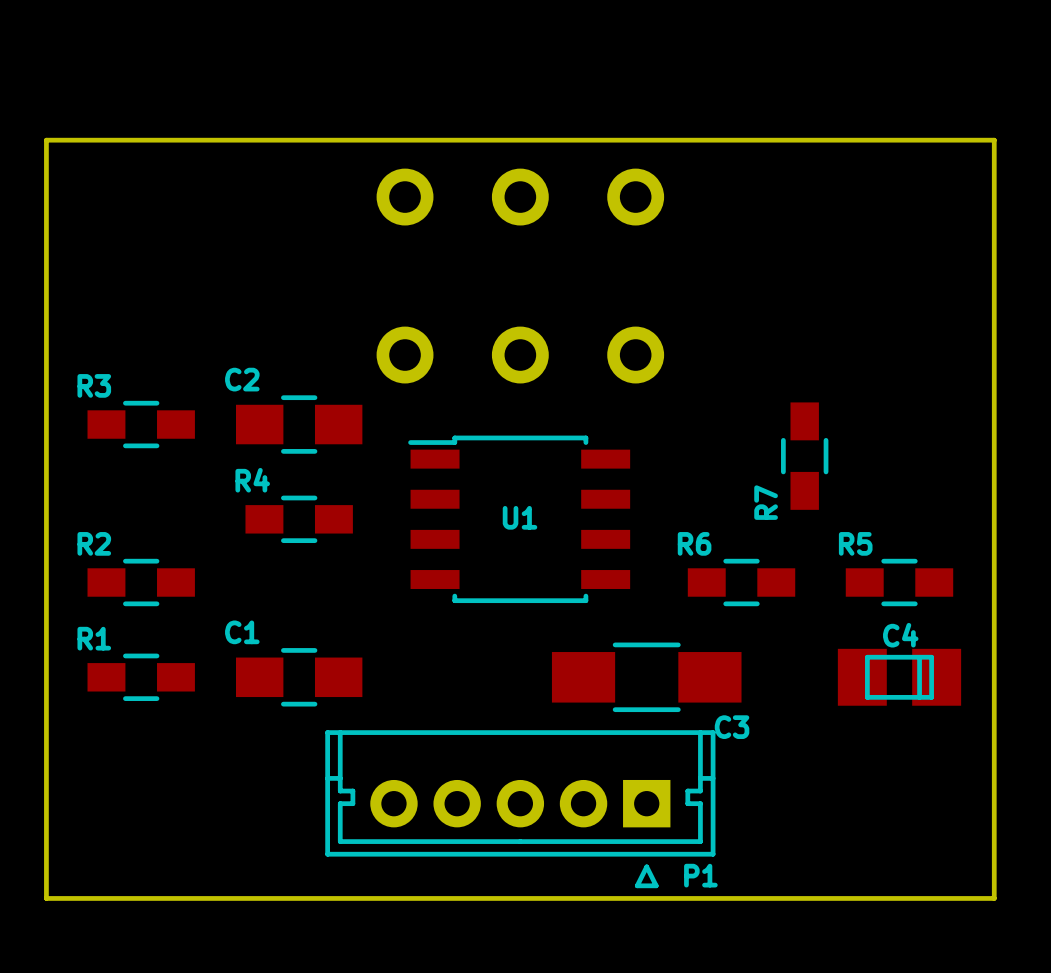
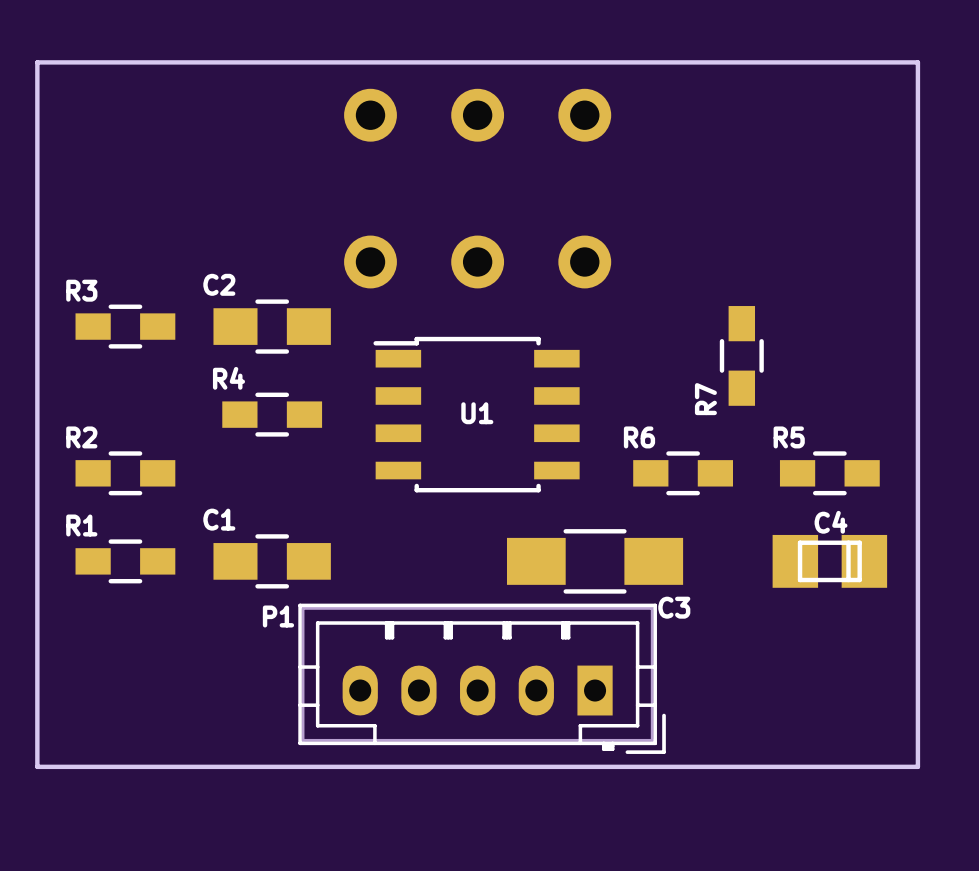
P1 footprint: [325, 730, 716, 889] -> [298, 603, 666, 754]
P1 name position: P1 (700, 875) -> P1 (278, 616)

